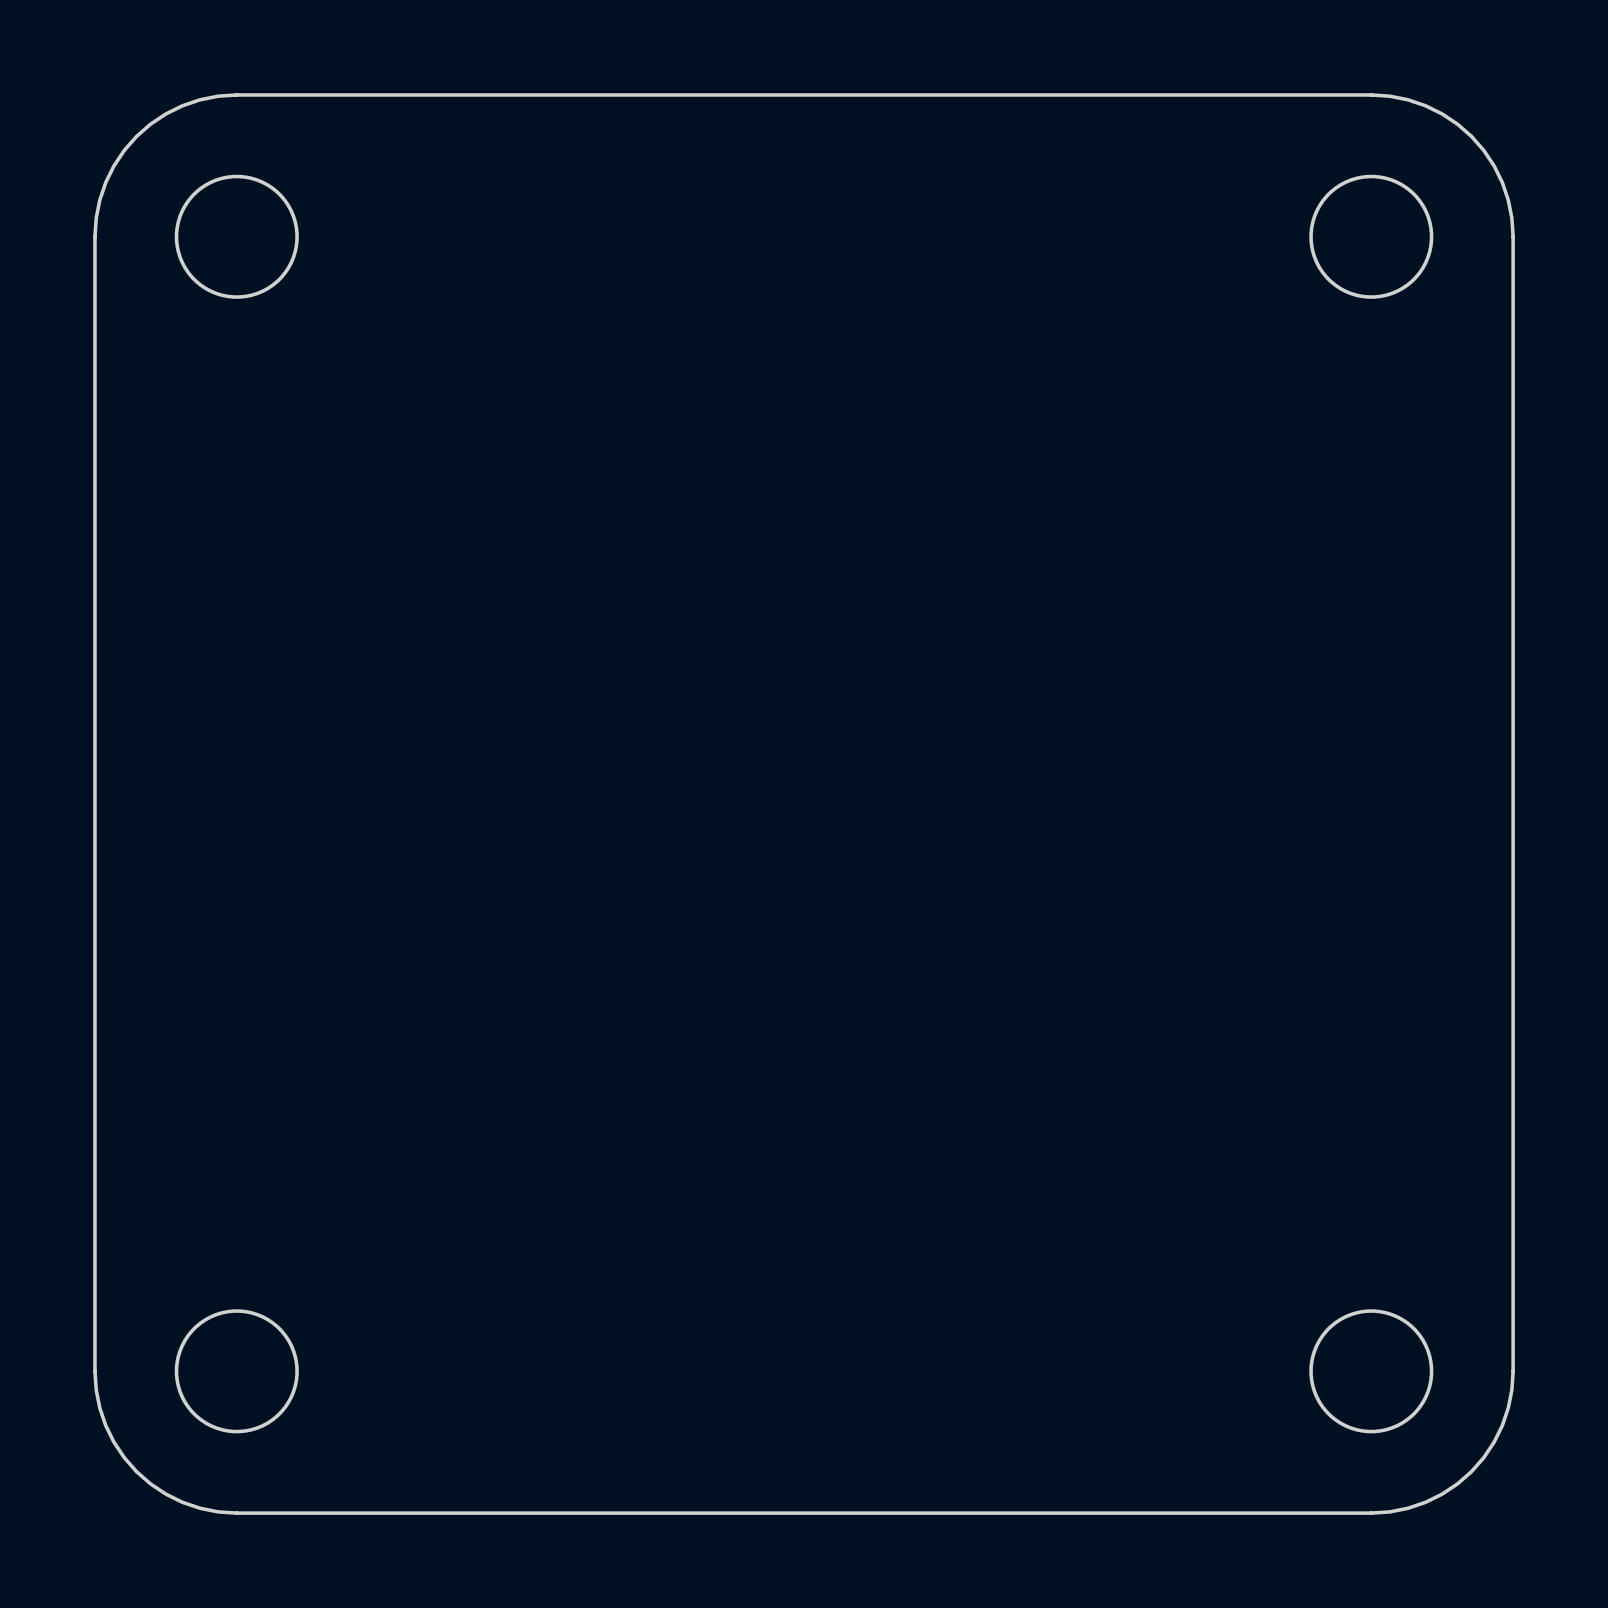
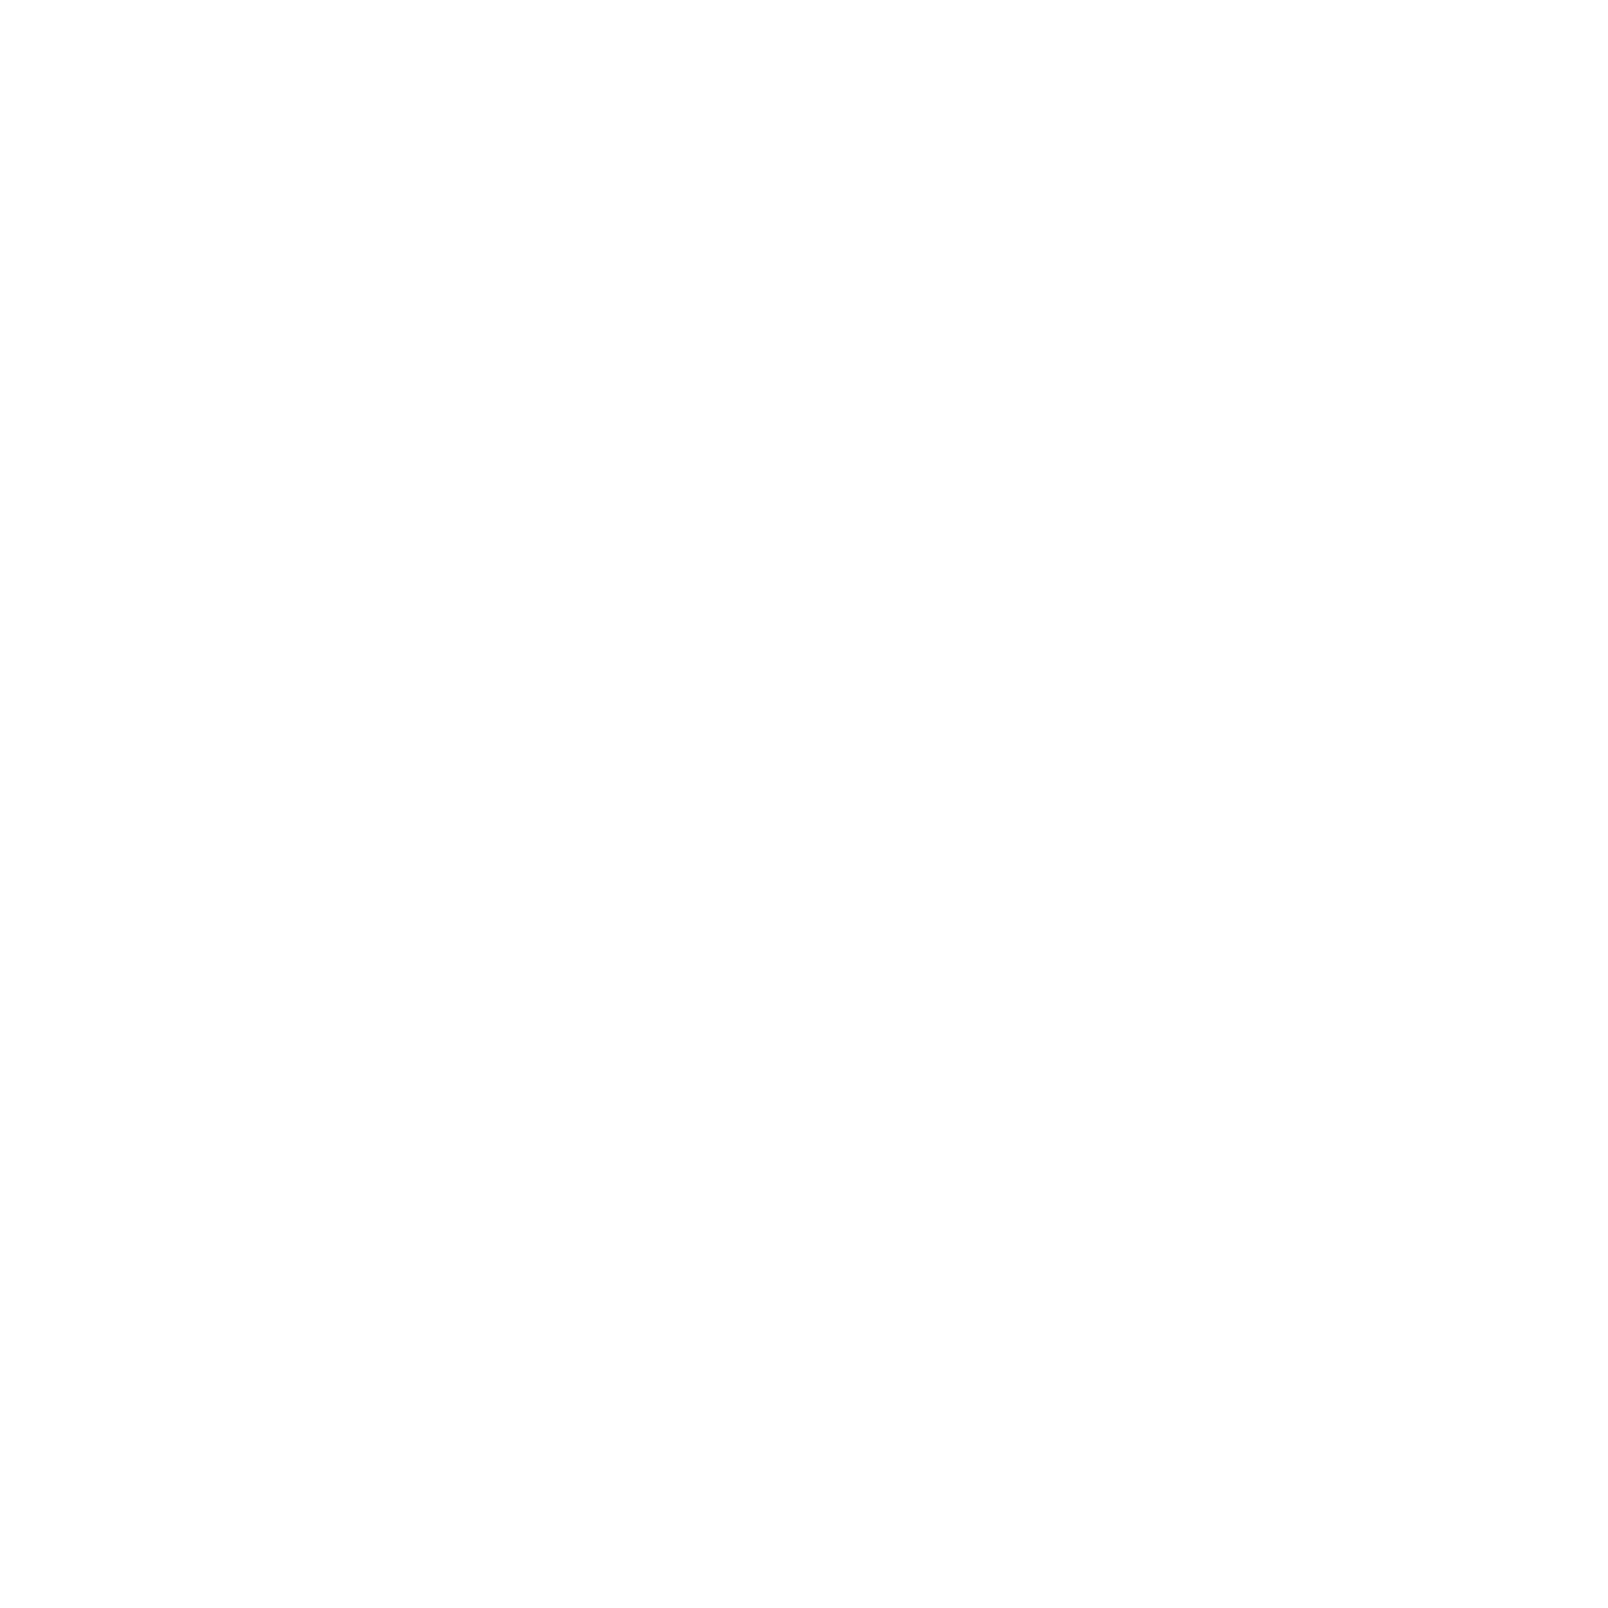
board edge: (1371, 94) (236, 94) (200, 99) (182, 105) (165, 113) (136, 136) (113, 165) (105, 182) (96, 218) (94, 236) (94, 1371) (99, 1408) (105, 1425) (113, 1442) (136, 1471) (150, 1483) (182, 1502) (200, 1508) (236, 1513) (1371, 1513) (1408, 1508) (1425, 1502) (1457, 1483) (1471, 1471) (1483, 1457) (1502, 1425) (1508, 1408) (1513, 1371) (1511, 218) (1502, 182) (1494, 165) (1471, 136) (1457, 124) (1425, 105) (1408, 99) (1371, 94) -> none
round board edge: [174, 174, 299, 299] -> none
round board edge: [1309, 174, 1434, 299] -> none
round board edge: [174, 1309, 299, 1434] -> none
round board edge: [1309, 1309, 1434, 1434] -> none

